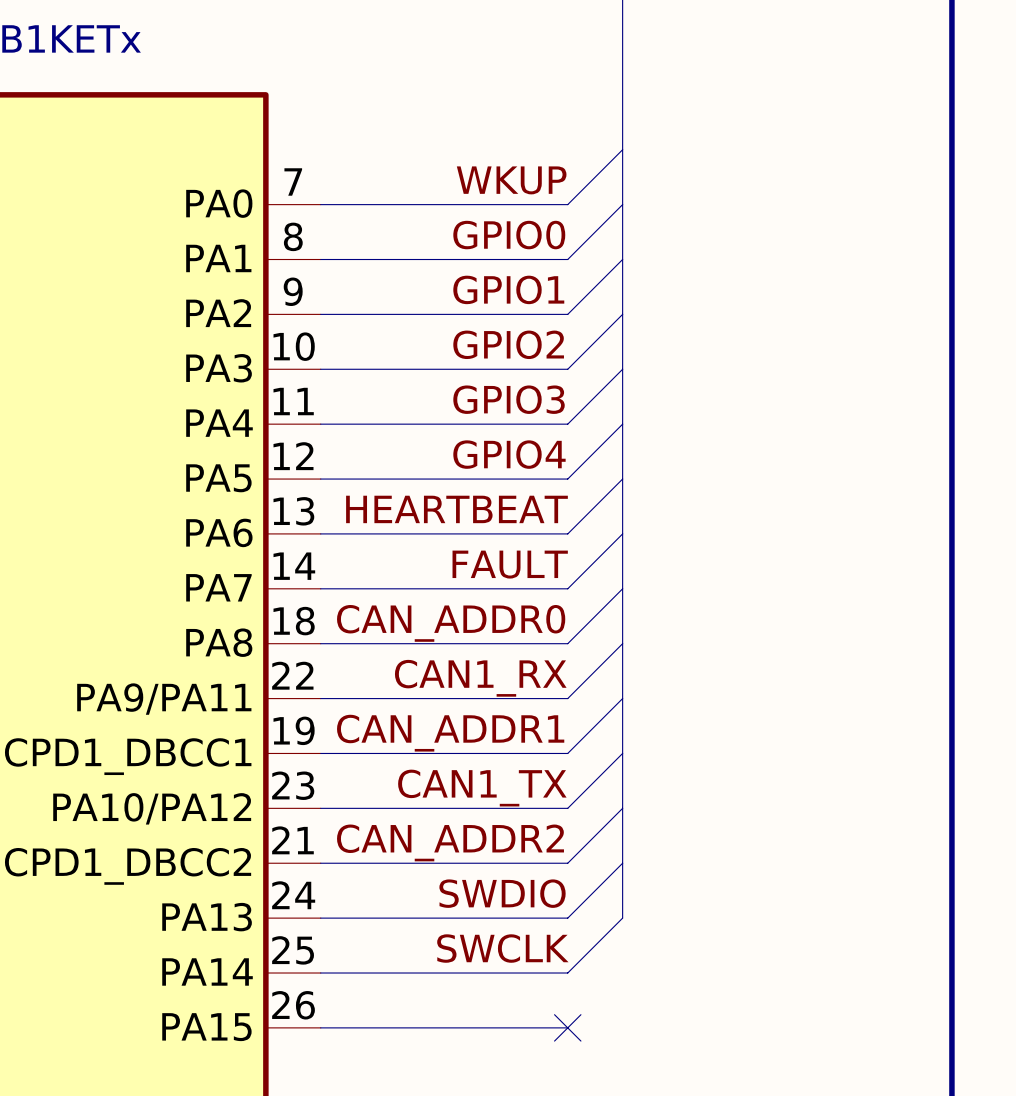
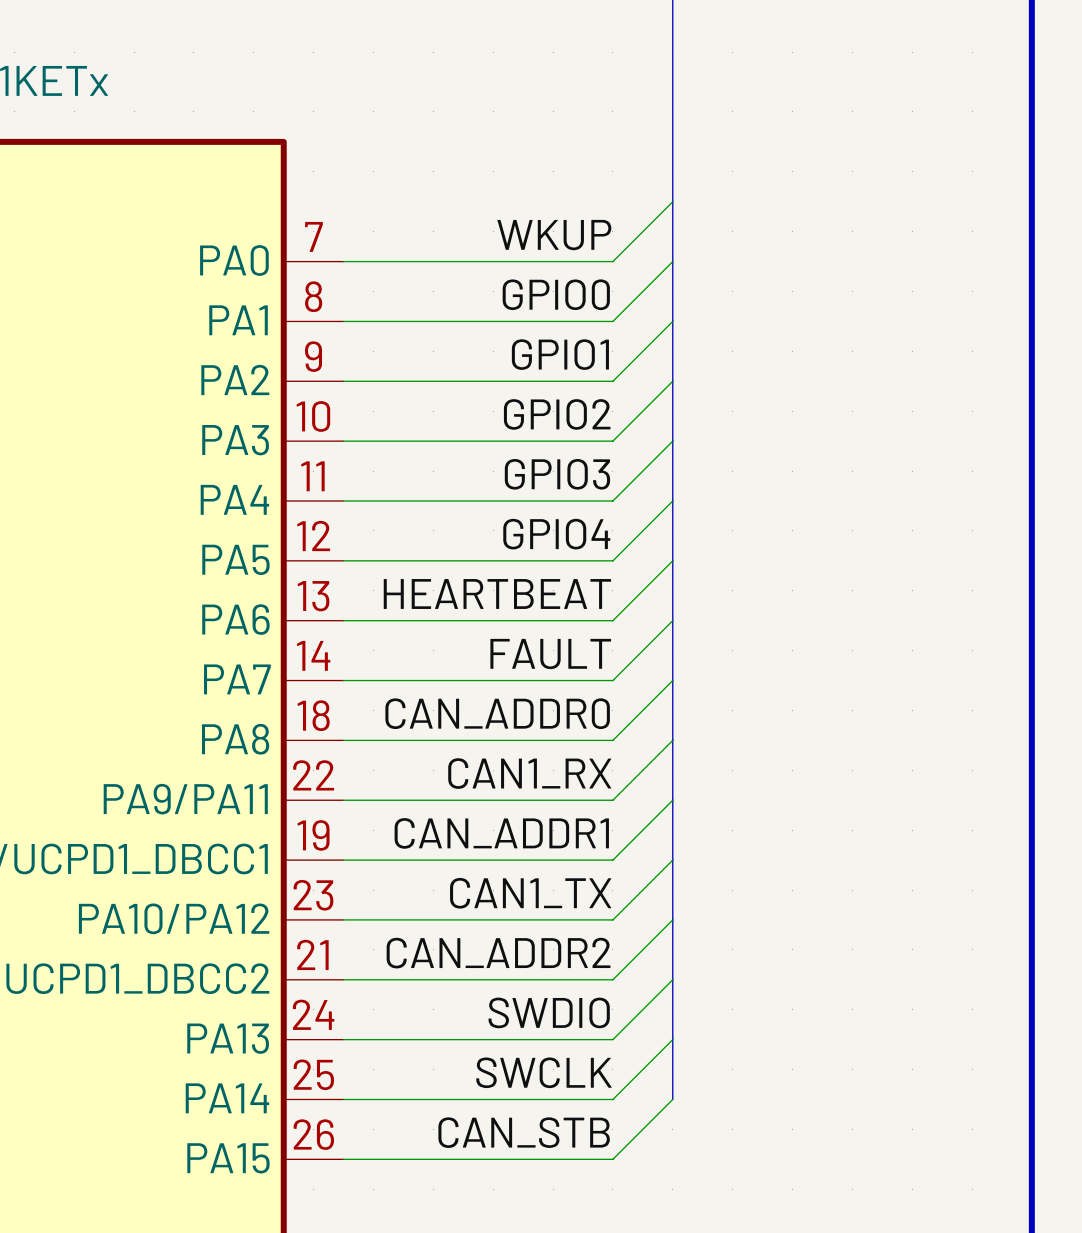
bus: none -> (672, 1039) (672, 1099)
wire: none -> (672, 1099) (612, 1159)
label: none -> CAN_STB (524, 1132)
no-connect mark: (567, 1027) -> none

